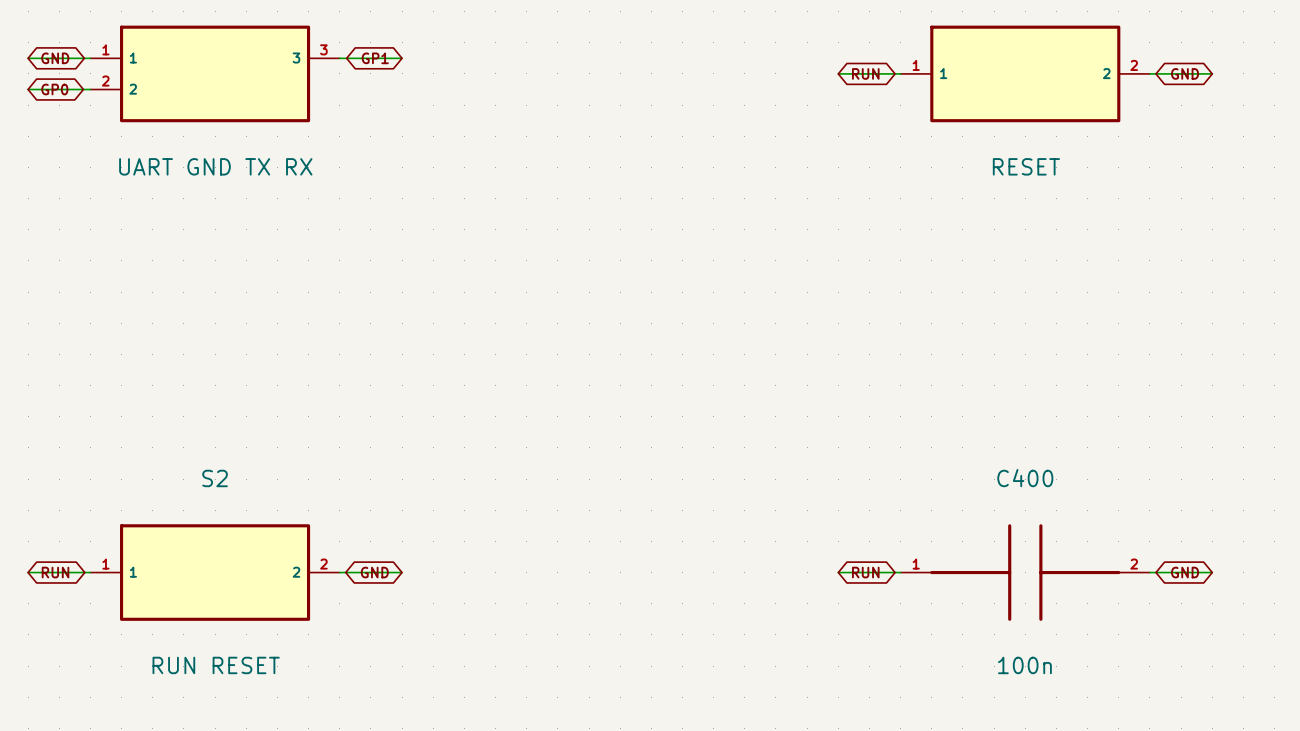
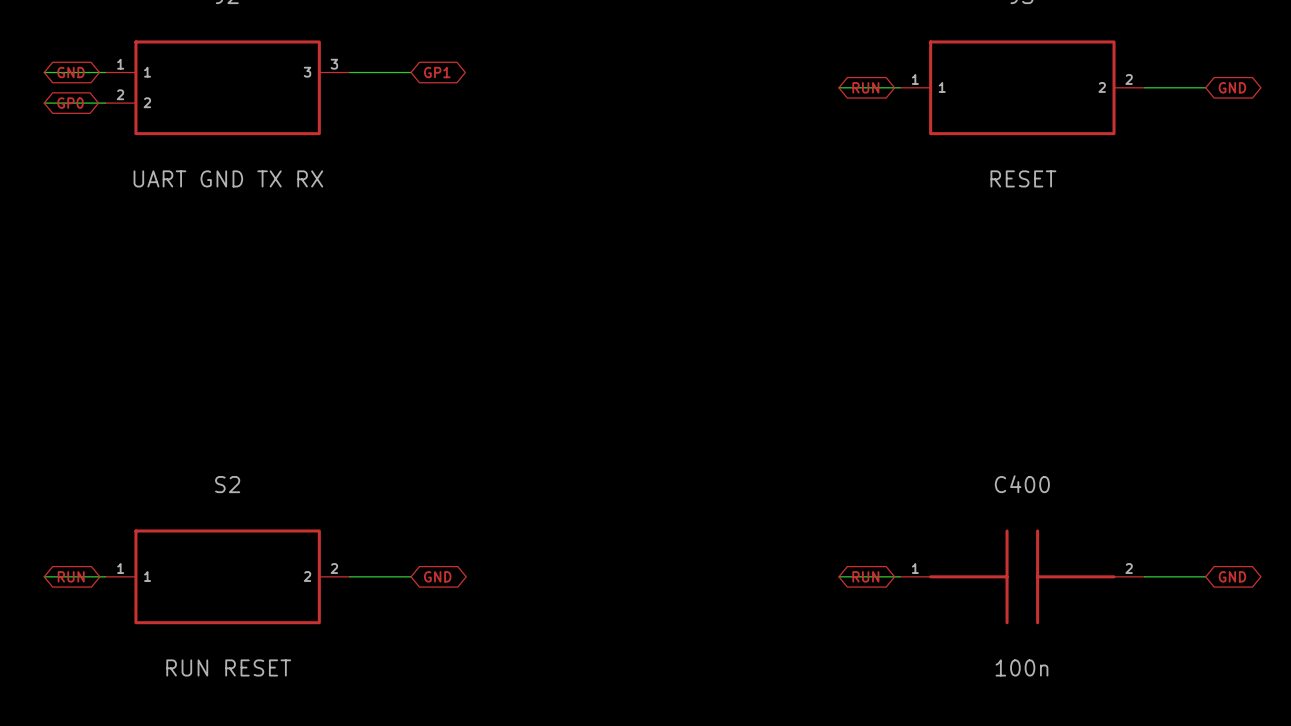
global label rotation: 0° (375, 58) -> 180° (437, 72)
global label rotation: 0° (1185, 73) -> 180° (1232, 87)
global label rotation: 0° (374, 572) -> 180° (437, 576)
global label rotation: 0° (1185, 572) -> 180° (1232, 576)

